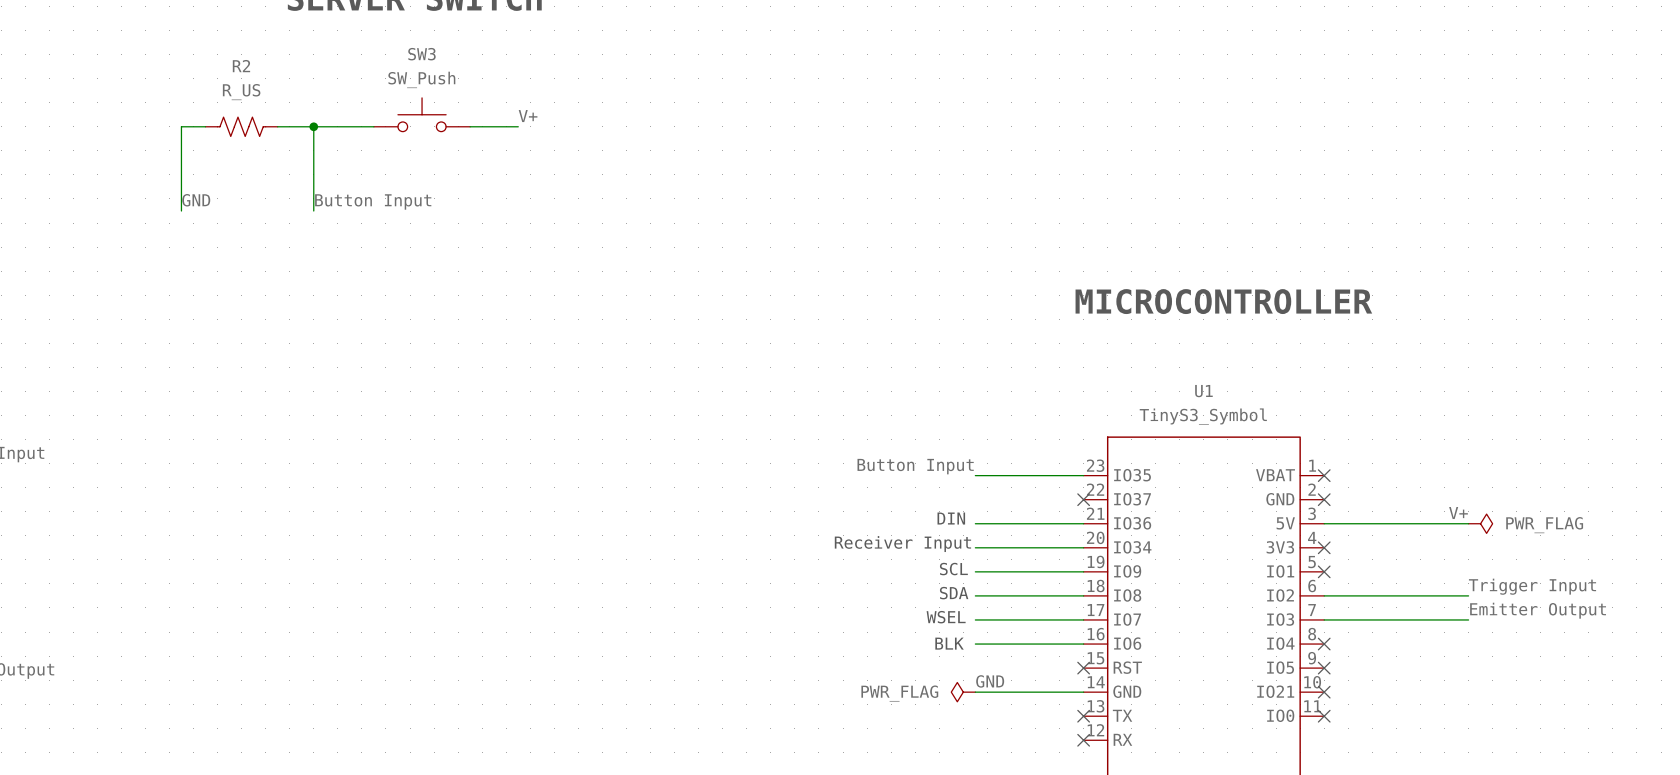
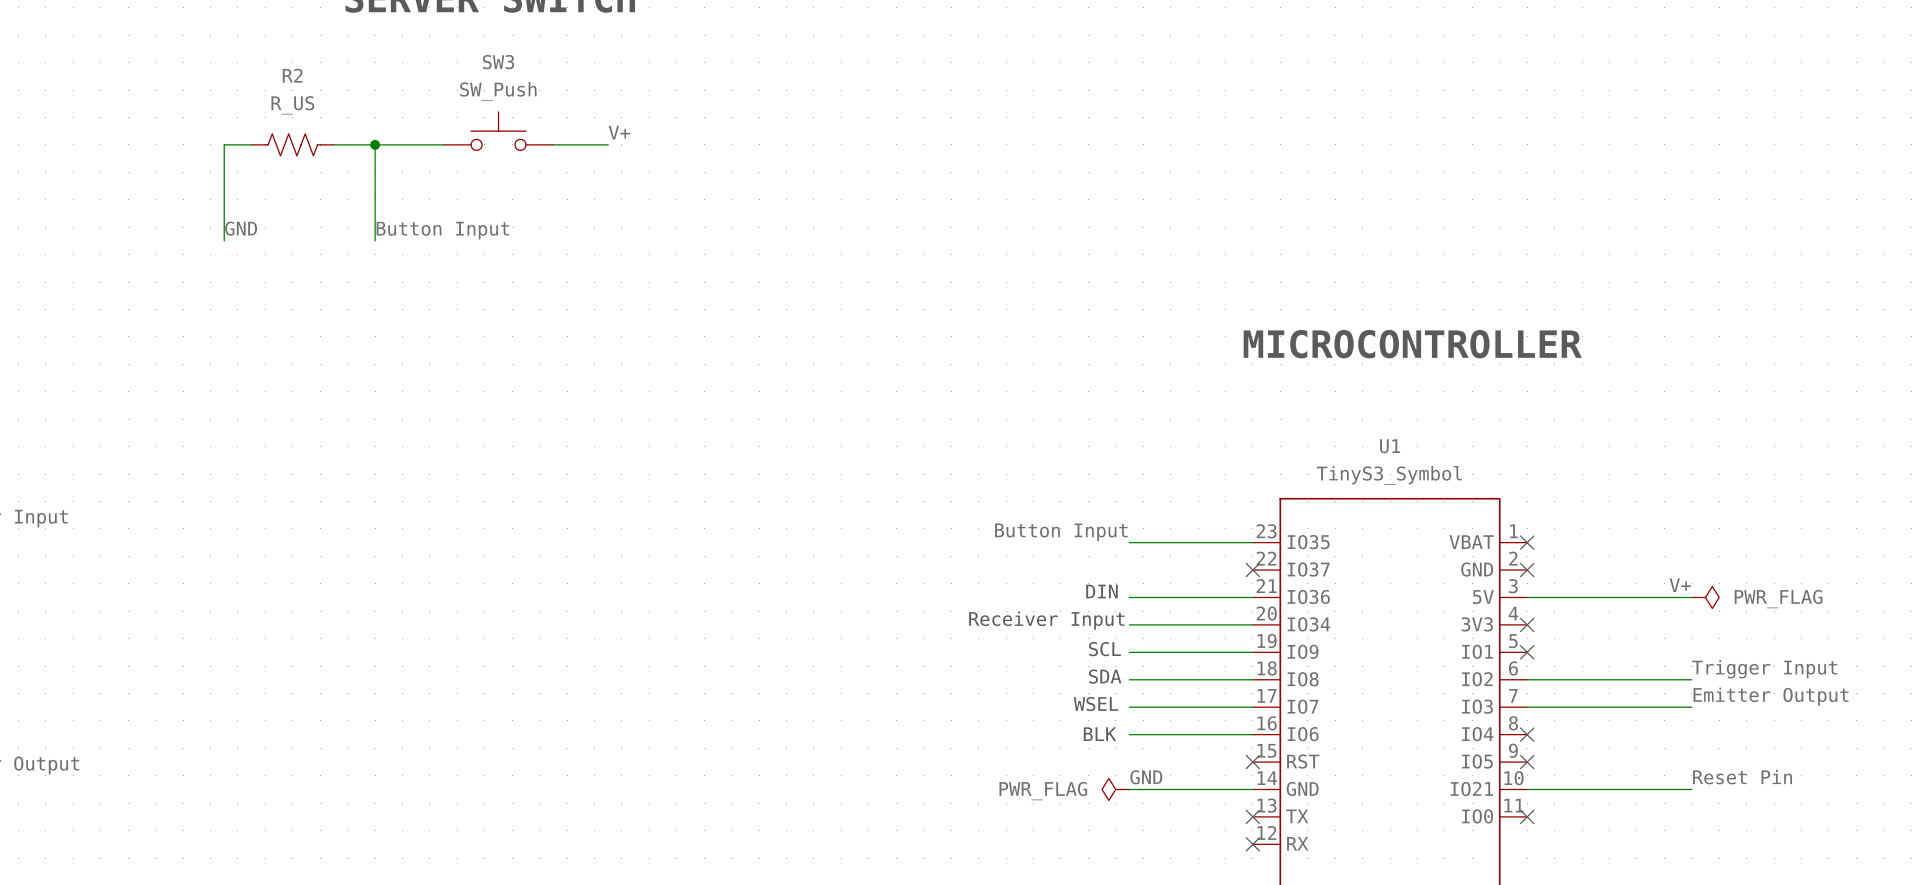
label: none -> Reset Pin (1742, 777)
wire: none -> (1527, 789) (1691, 789)
no-connect mark: (1324, 692) -> none

